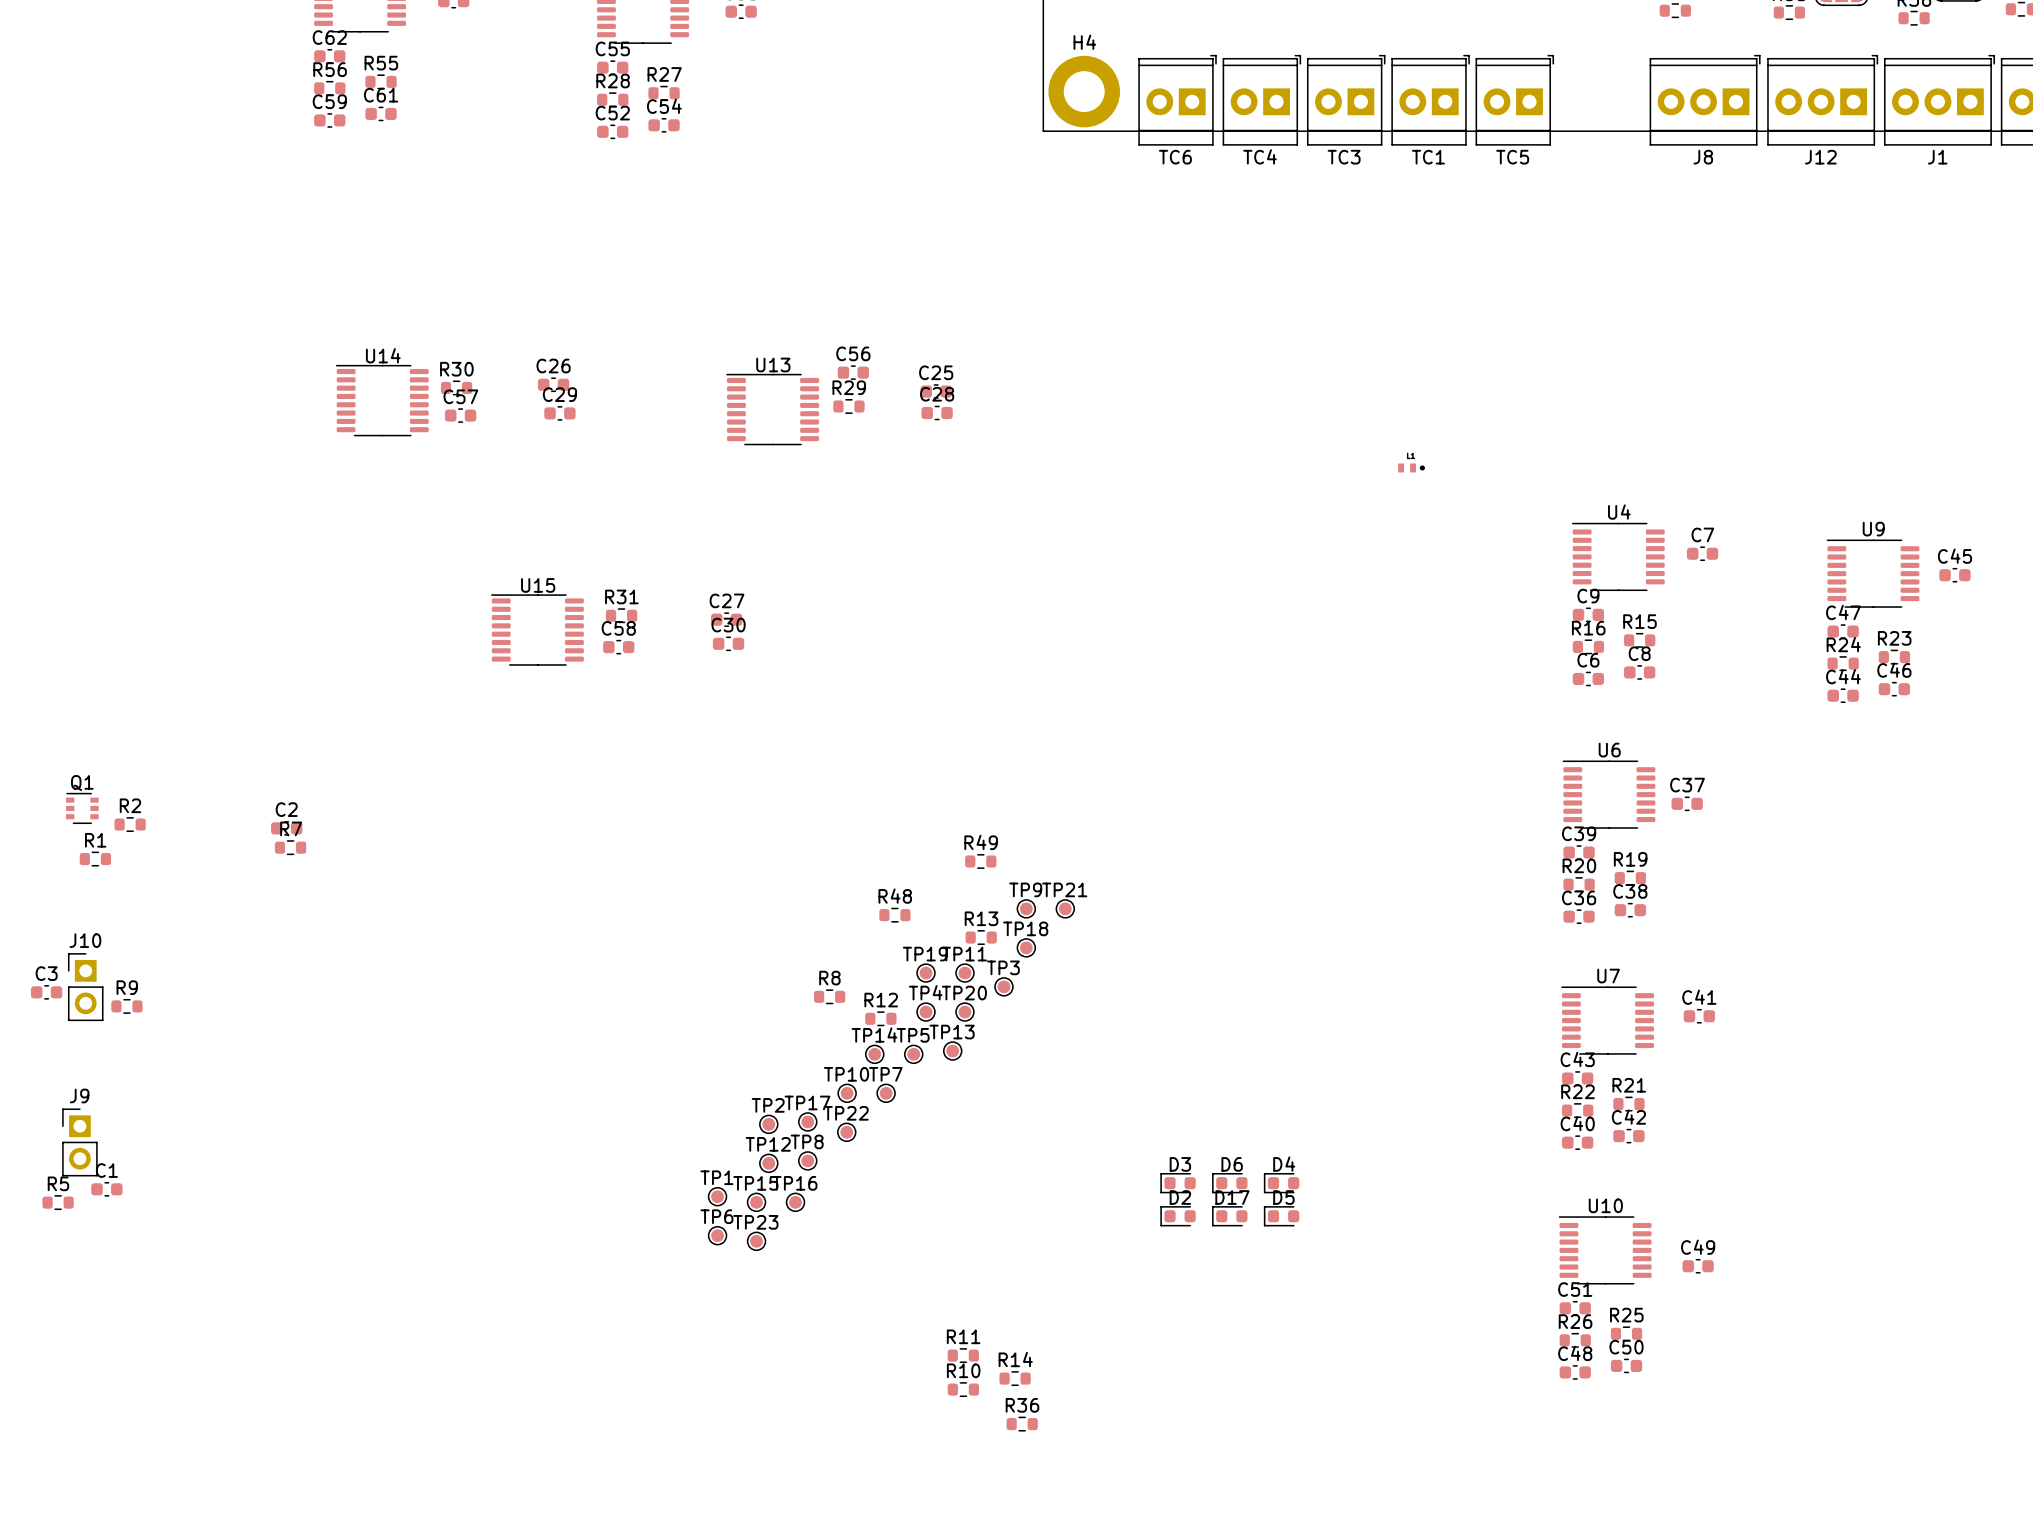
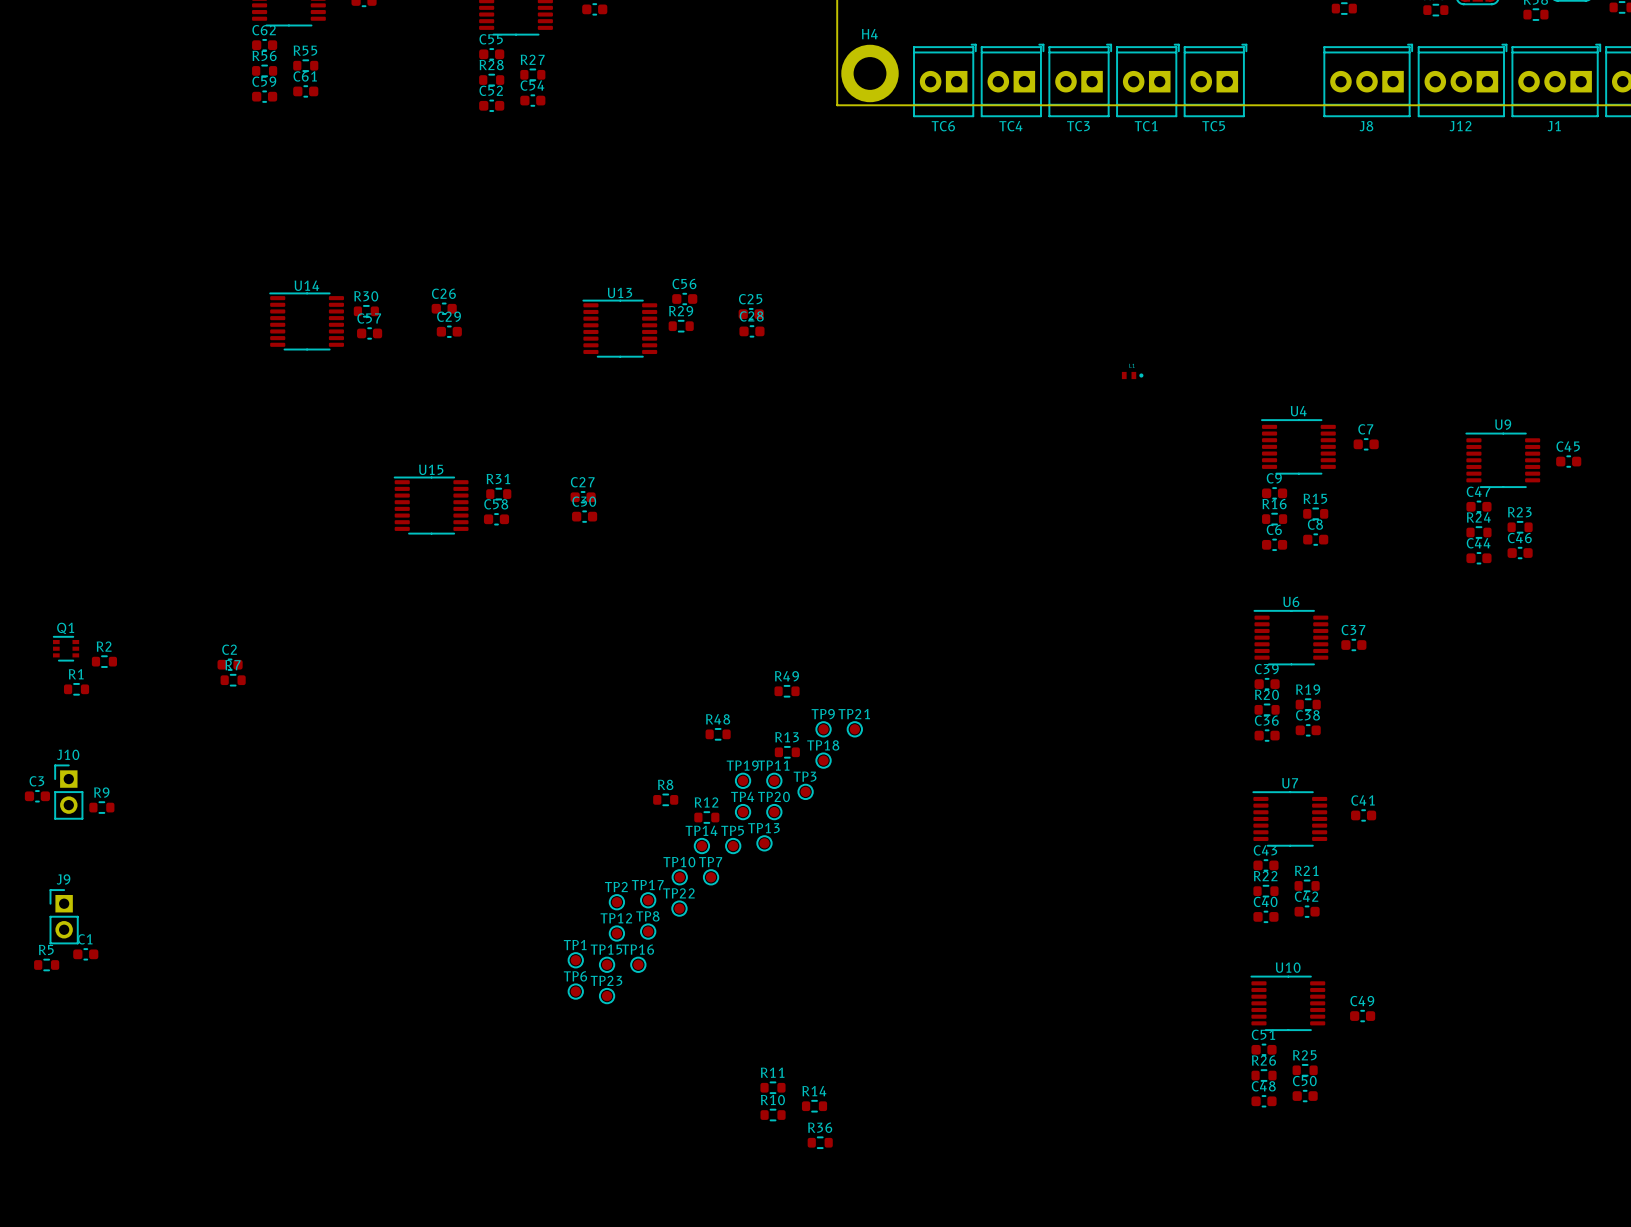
D3: (1178, 1183) -> none
D6: (1229, 1183) -> none
D4: (1281, 1183) -> none
D2: (1178, 1216) -> none
D17: (1229, 1216) -> none
D5: (1281, 1216) -> none

